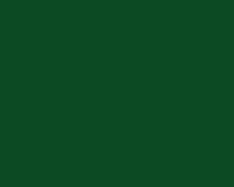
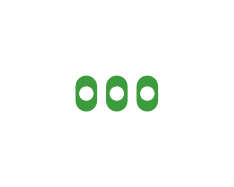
part: none -> (116, 93)

